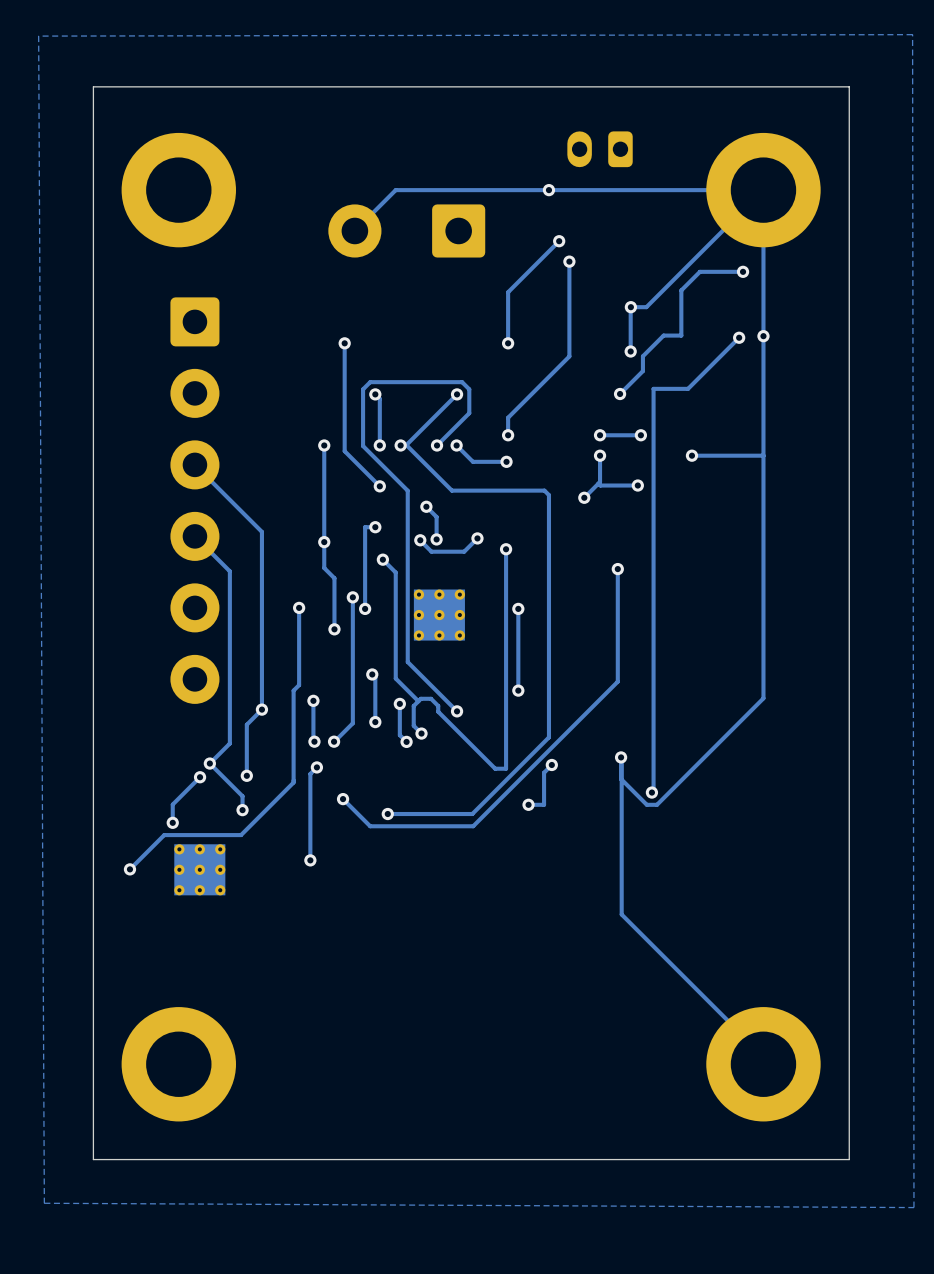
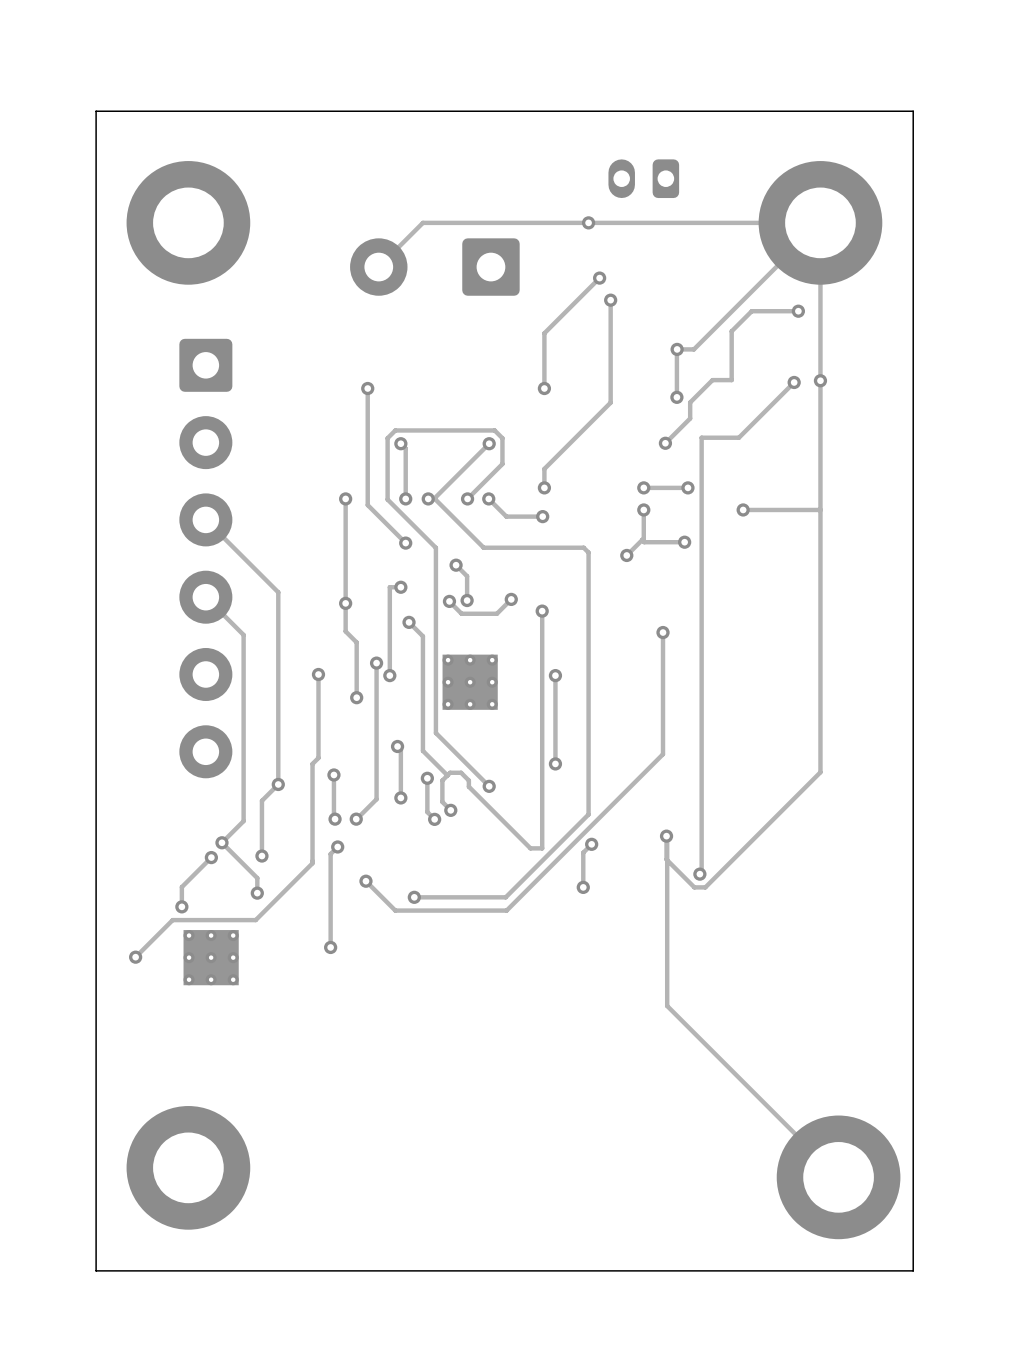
zone outline: (912, 34) (38, 36) (44, 1203) (913, 1207) (912, 34) -> none
via position: (528, 804) -> (583, 887)
track: (544, 804) (528, 804) -> none
part position: (763, 1064) -> (838, 1177)

